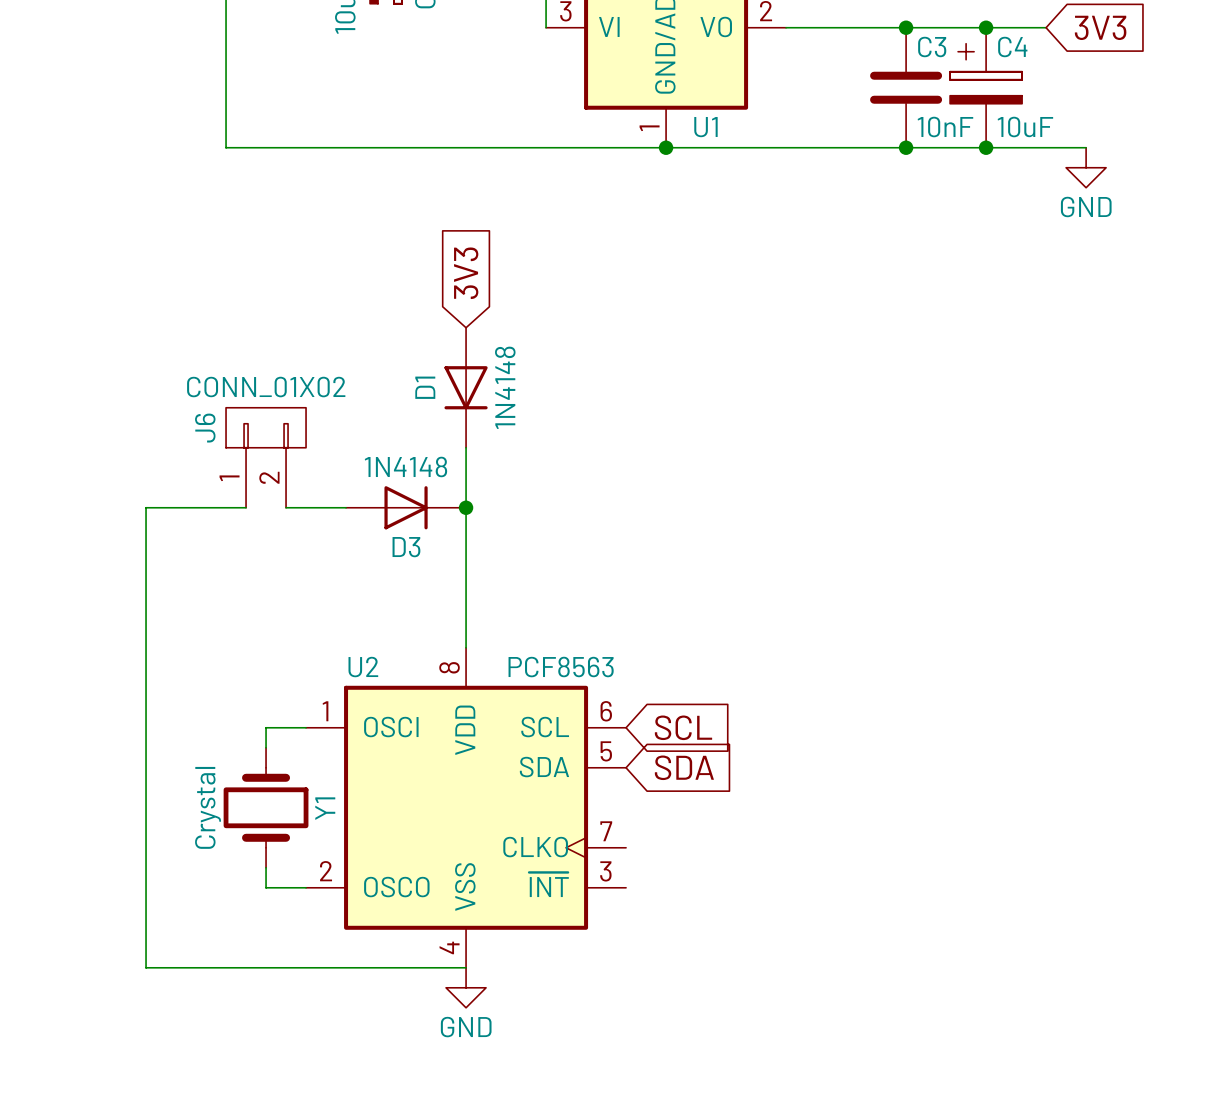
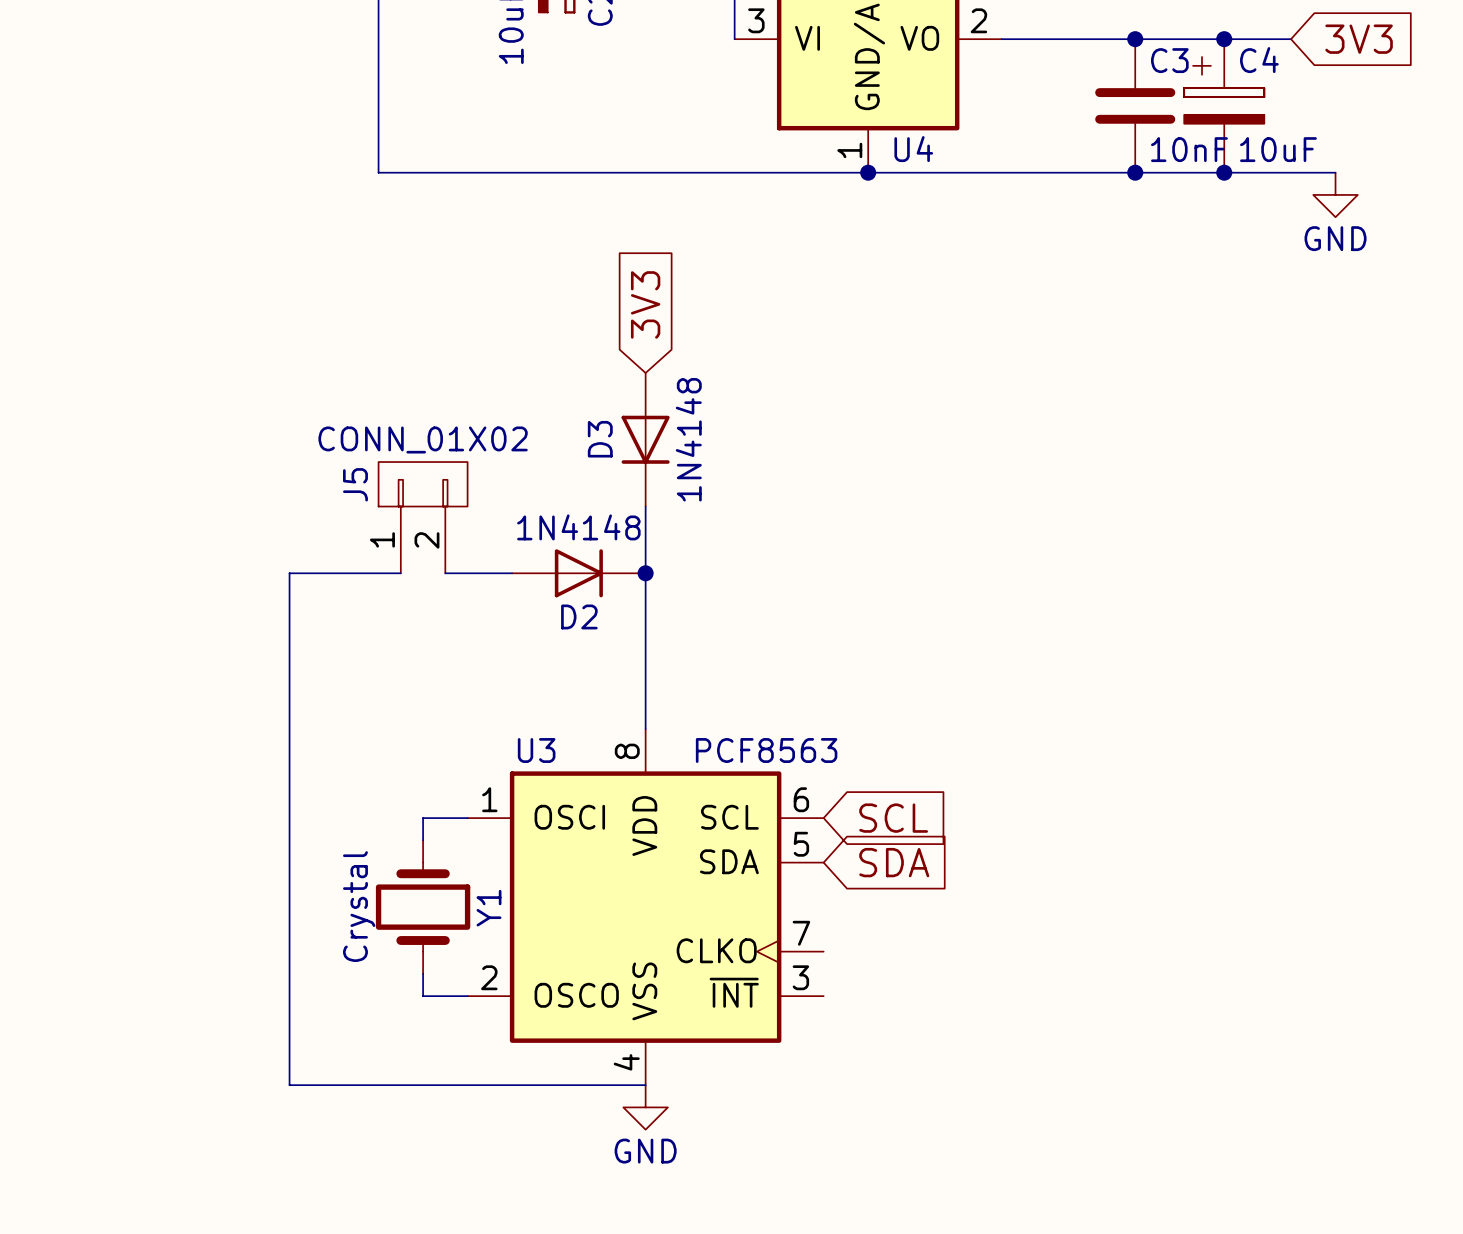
U1 name: U1 (705, 127) -> U4 (913, 149)
D1 name: D1 (425, 387) -> D3 (600, 439)
J6 name: J6 (205, 428) -> J5 (355, 484)
D3 name: D3 (406, 547) -> D2 (579, 616)
U2 name: U2 (363, 667) -> U3 (536, 750)

